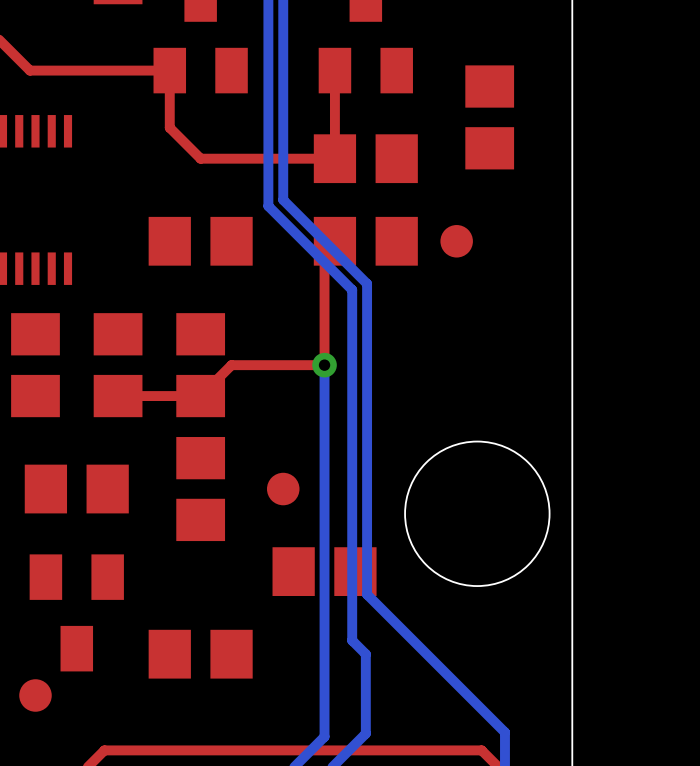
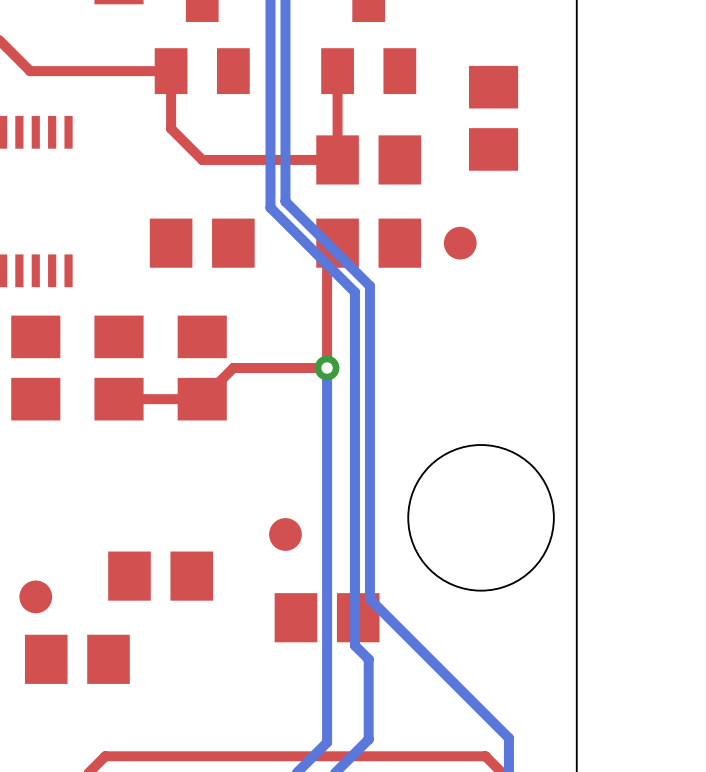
part: (76, 489) -> none
part: (200, 489) -> none
part position: (283, 489) -> (285, 534)
part: none -> (160, 576)
part position: (324, 571) -> (327, 617)
part: (76, 612) -> none
part: none -> (77, 659)
part: (200, 654) -> none
part position: (35, 695) -> (35, 596)

